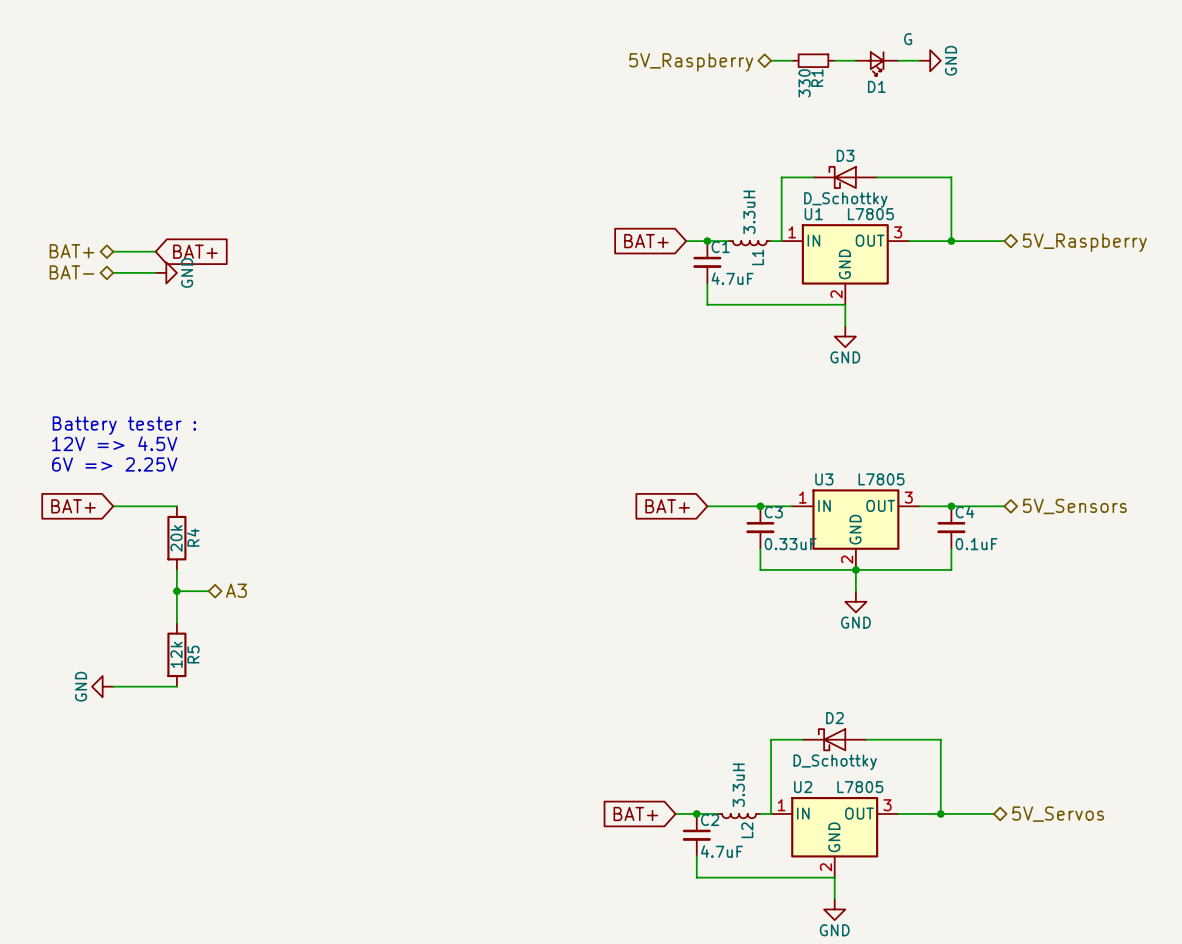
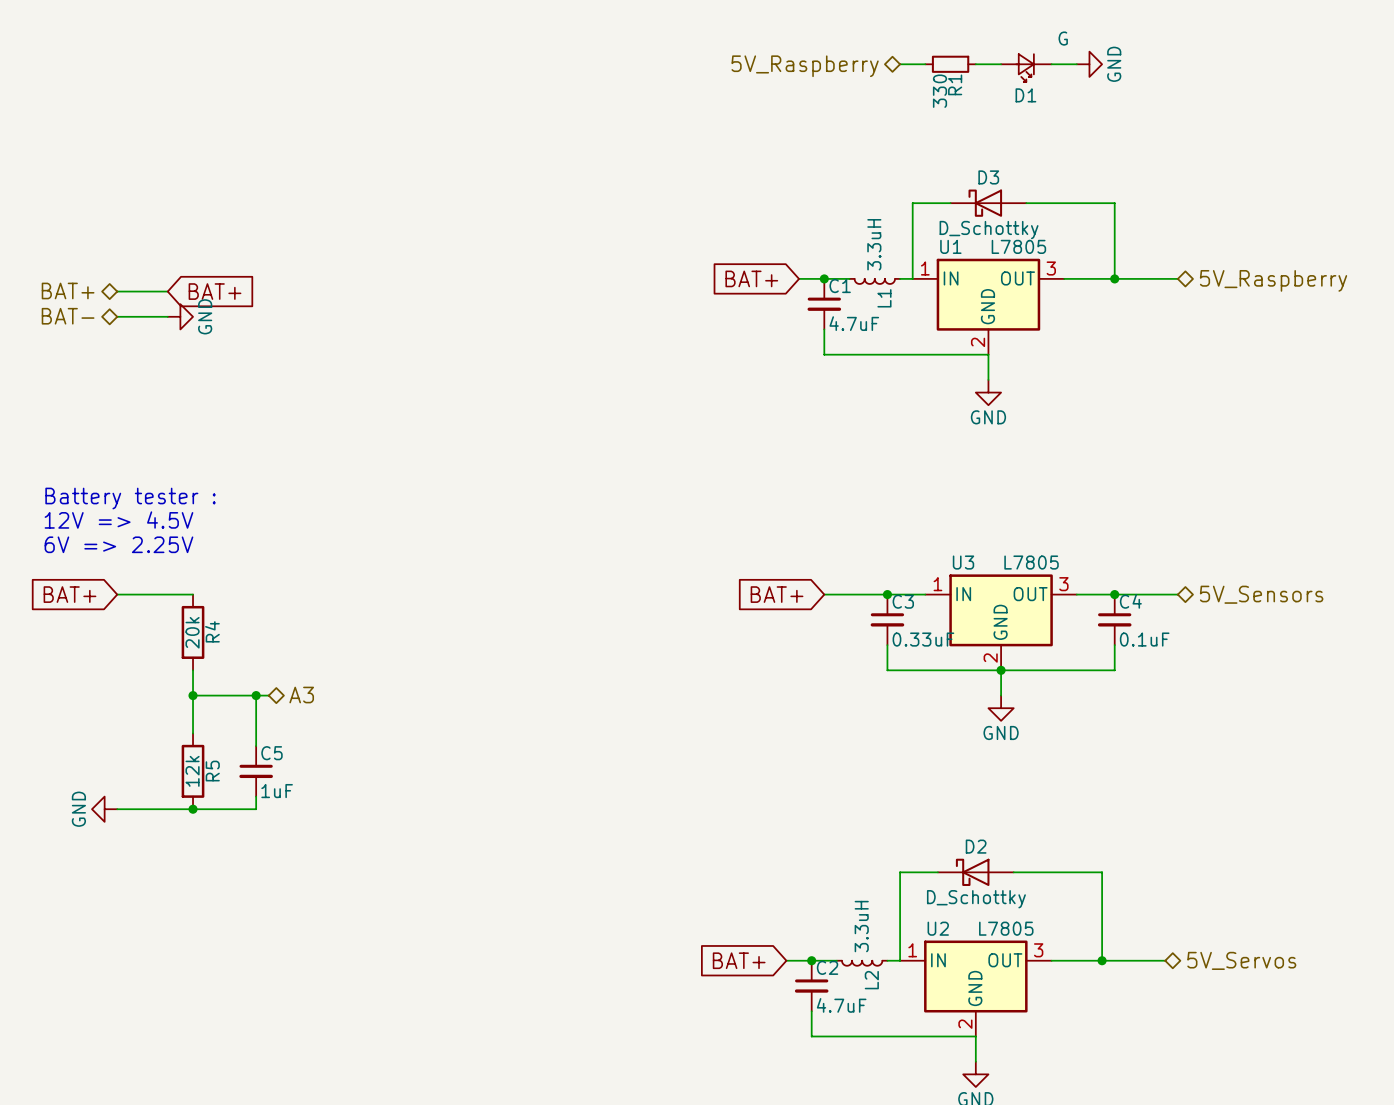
hierarchical label position: A3 (236, 590) -> A3 (301, 695)
wire: none -> (230, 695) (268, 695)
wire: none -> (256, 695) (256, 746)
junction: none -> (256, 695)
C5: none -> 1uF (256, 771)
wire: none -> (256, 796) (256, 809) (193, 809)
junction: none -> (193, 809)

